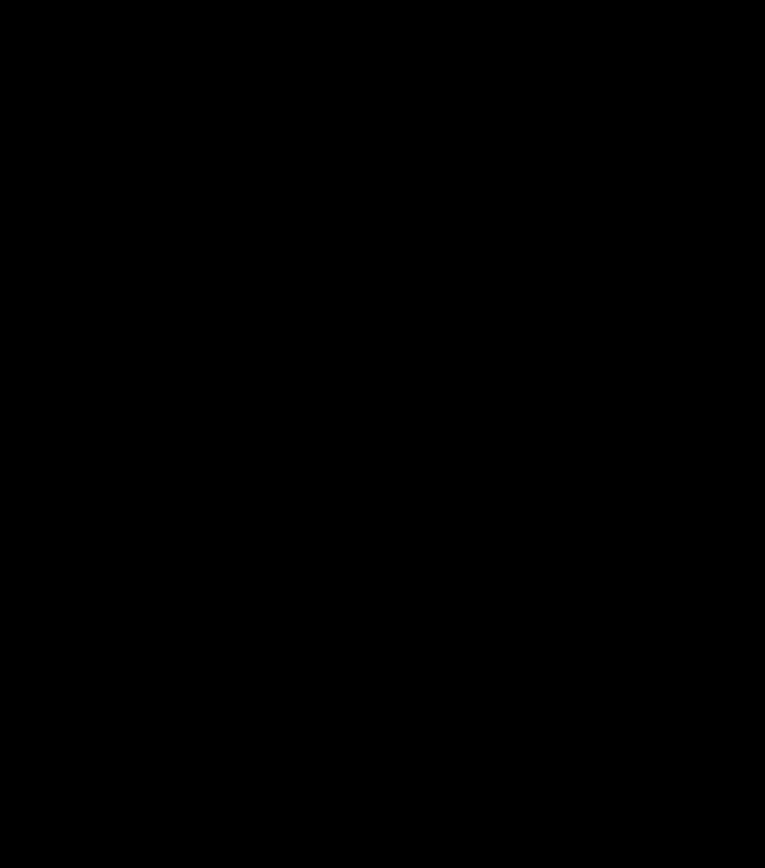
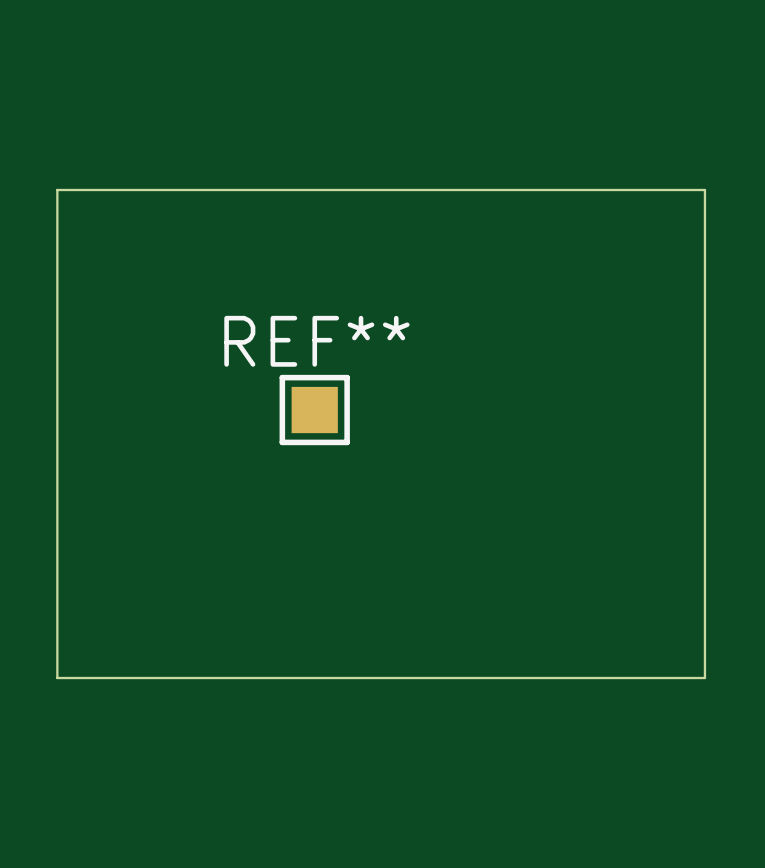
board edge: none -> (704, 190) (57, 190) (57, 678) (704, 678) (704, 190)
REF**: none -> (314, 410)

